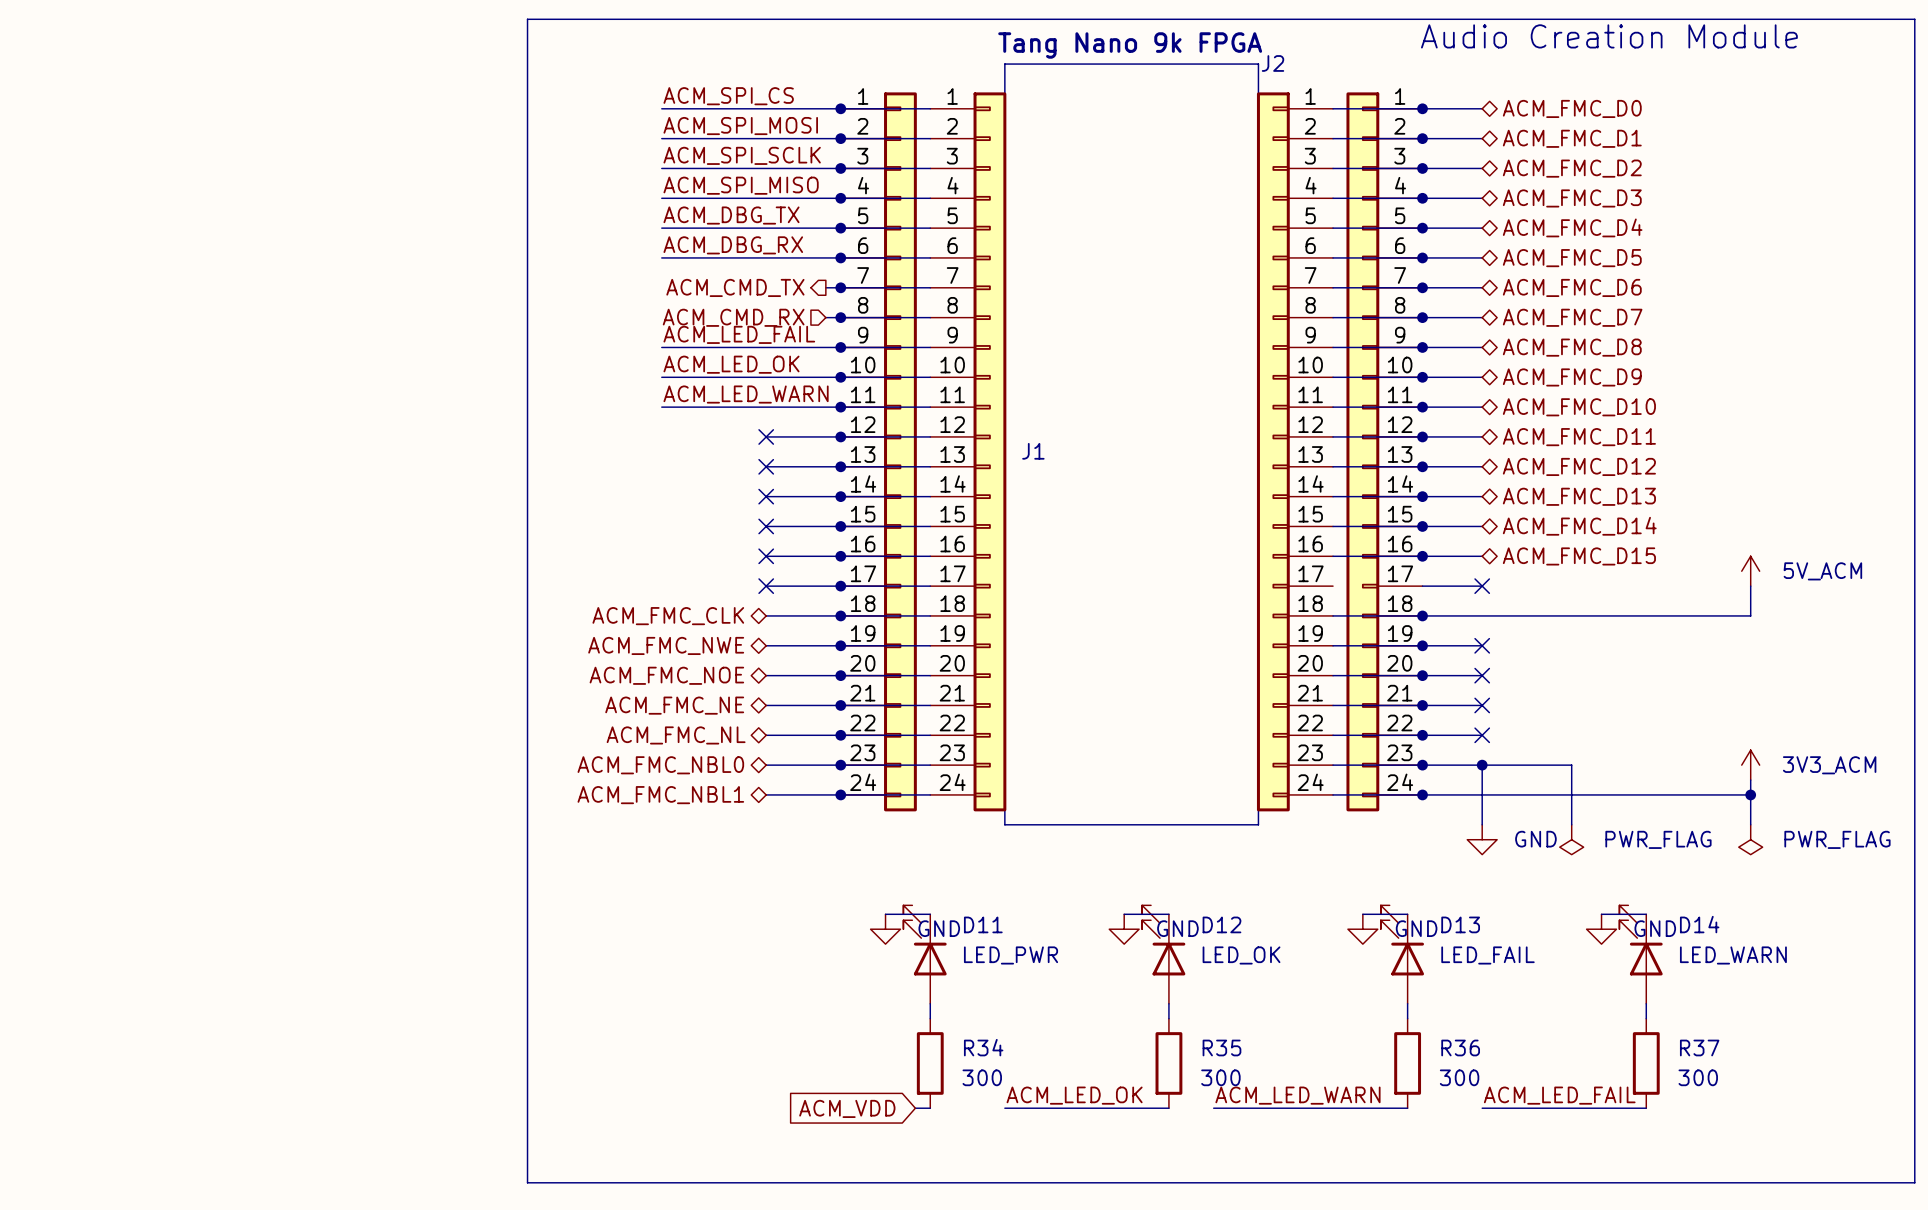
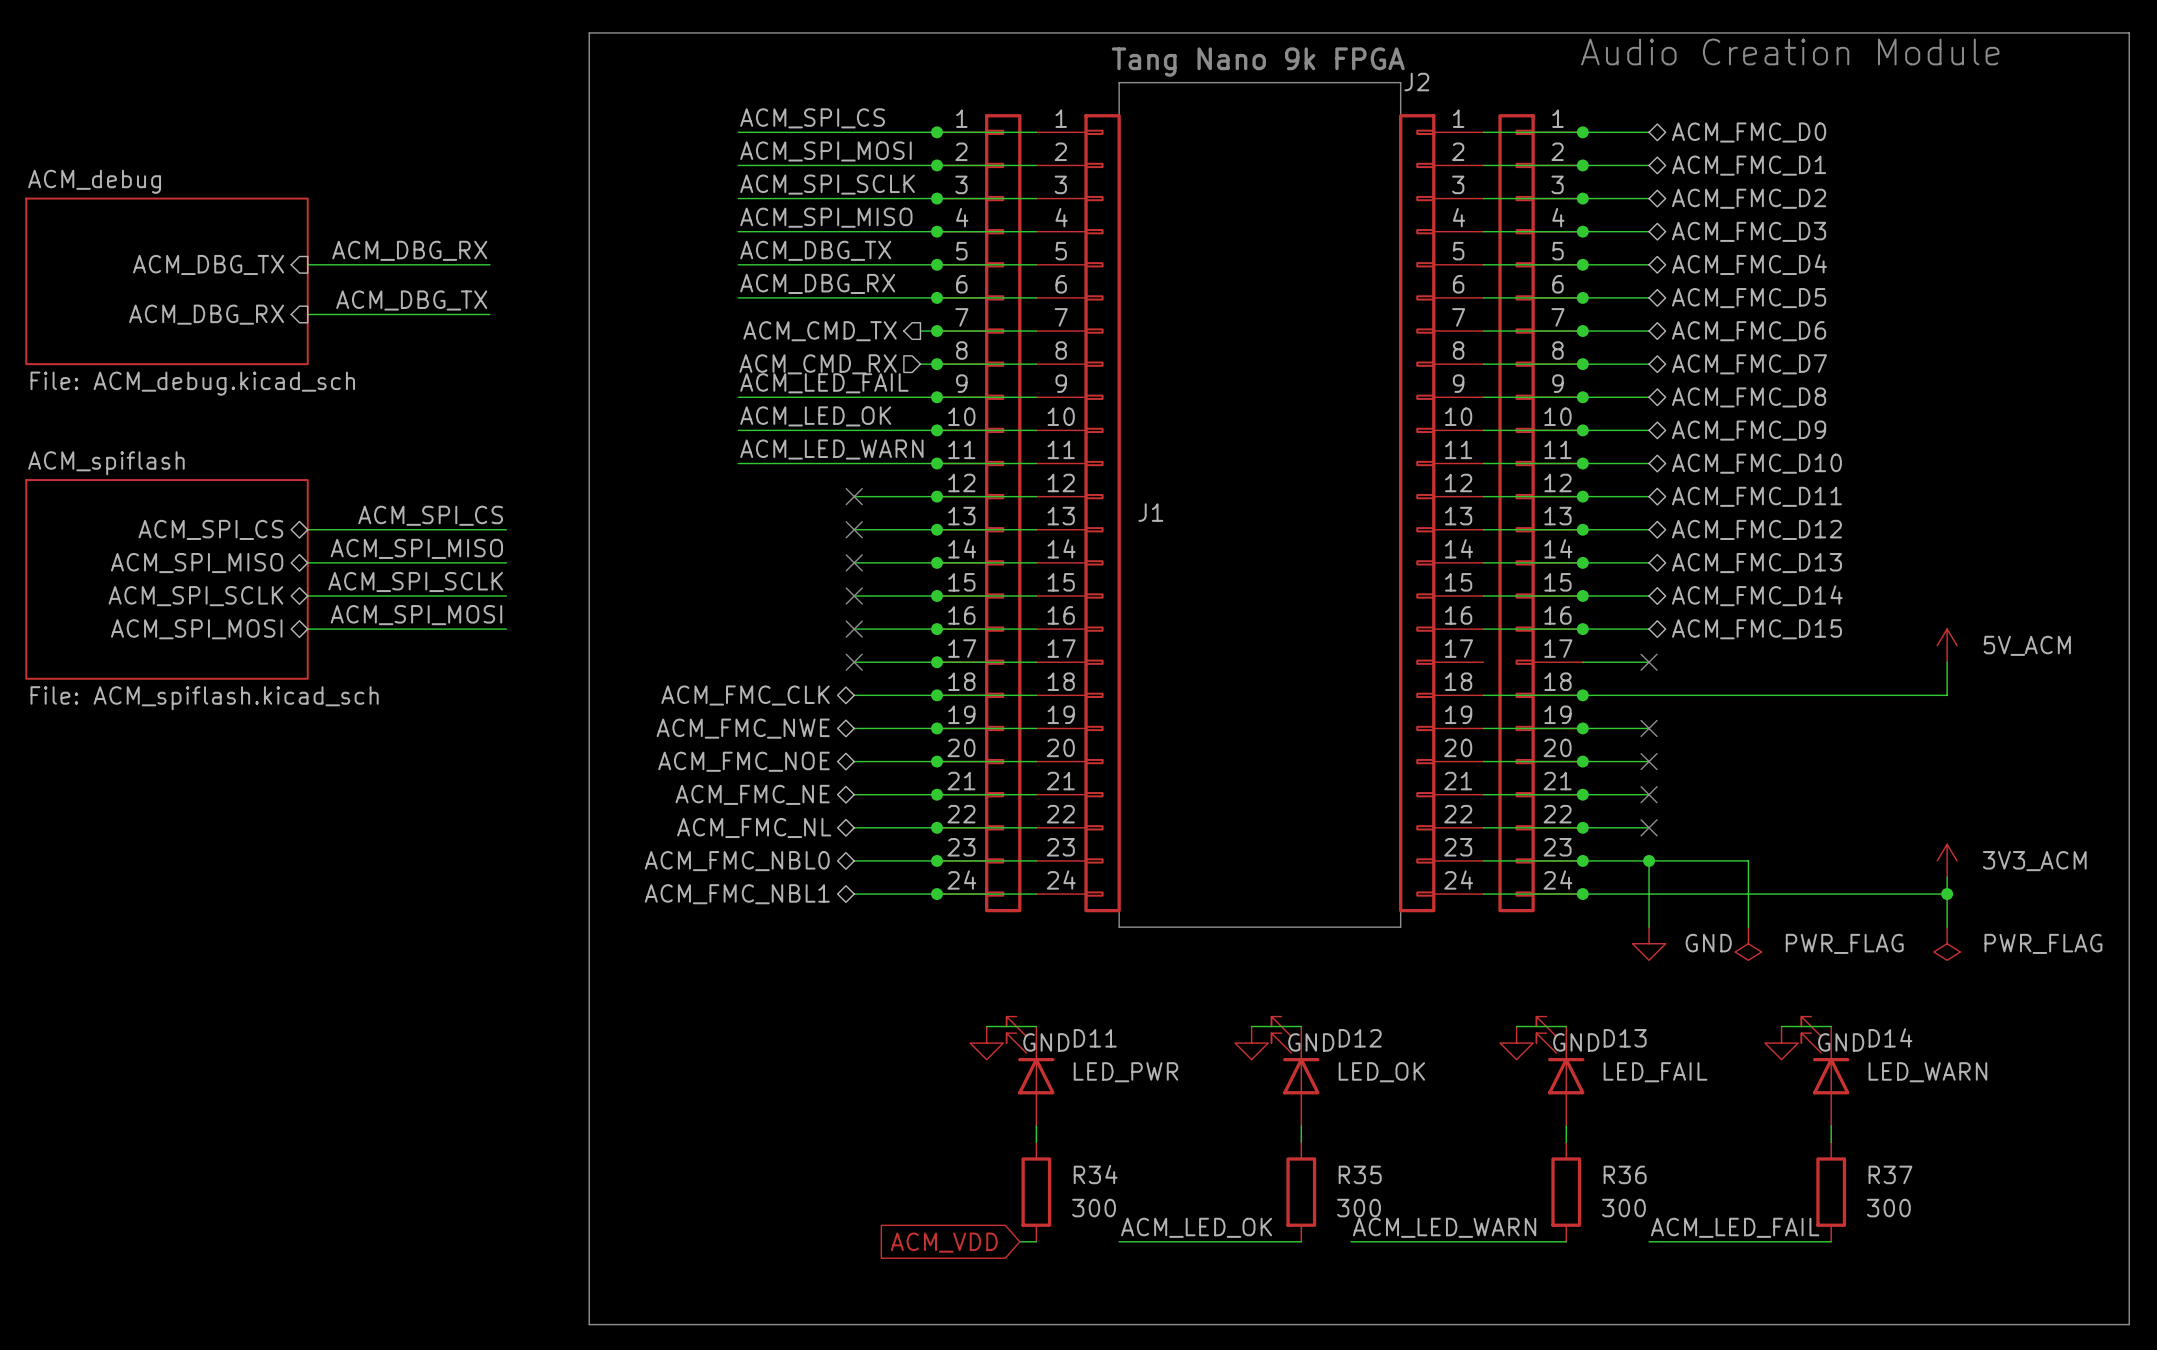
label: none -> ACM_DBG_RX (409, 250)
sheet pin: none -> ACM_DBG_TX (208, 264)
wire: none -> (307, 264) (489, 264)
sheet ACM_debug: none -> File: ACM_debug.kicad_sch (167, 281)
label: none -> ACM_DBG_TX (411, 300)
wire: none -> (307, 314) (489, 314)
sheet pin: none -> ACM_DBG_RX (206, 314)
label: none -> ACM_SPI_CS (430, 515)
sheet pin: none -> ACM_SPI_CS (210, 529)
wire: none -> (307, 529) (506, 529)
label: none -> ACM_SPI_MISO (416, 548)
sheet pin: none -> ACM_SPI_MISO (197, 563)
wire: none -> (307, 562) (506, 562)
sheet ACM_spiflash: none -> File: ACM_spiflash.kicad_sch (167, 579)
label: none -> ACM_SPI_SCLK (415, 581)
sheet pin: none -> ACM_SPI_SCLK (195, 596)
wire: none -> (307, 595) (506, 595)
label: none -> ACM_SPI_MOSI (416, 615)
sheet pin: none -> ACM_SPI_MOSI (196, 629)
wire: none -> (307, 629) (506, 629)

